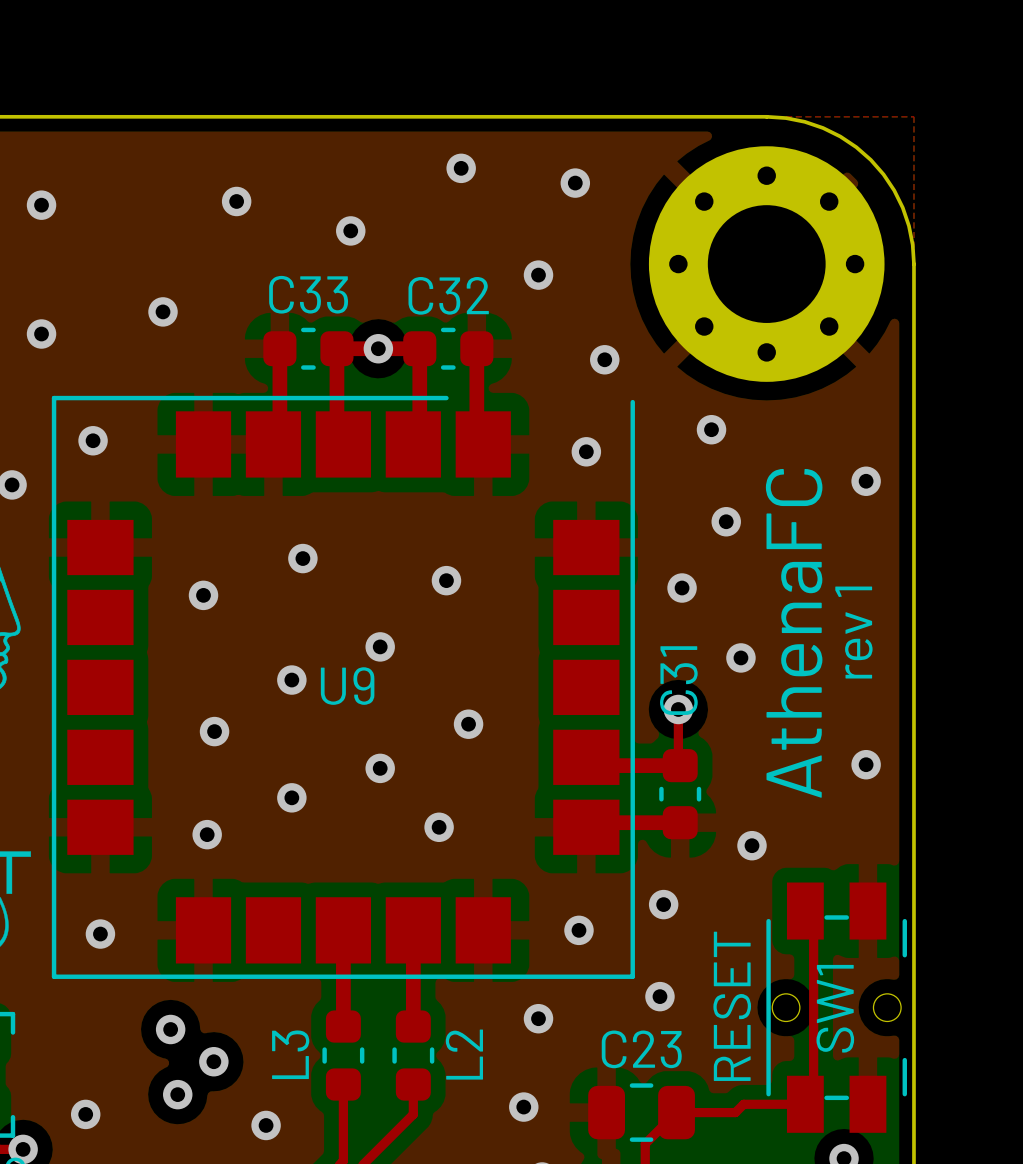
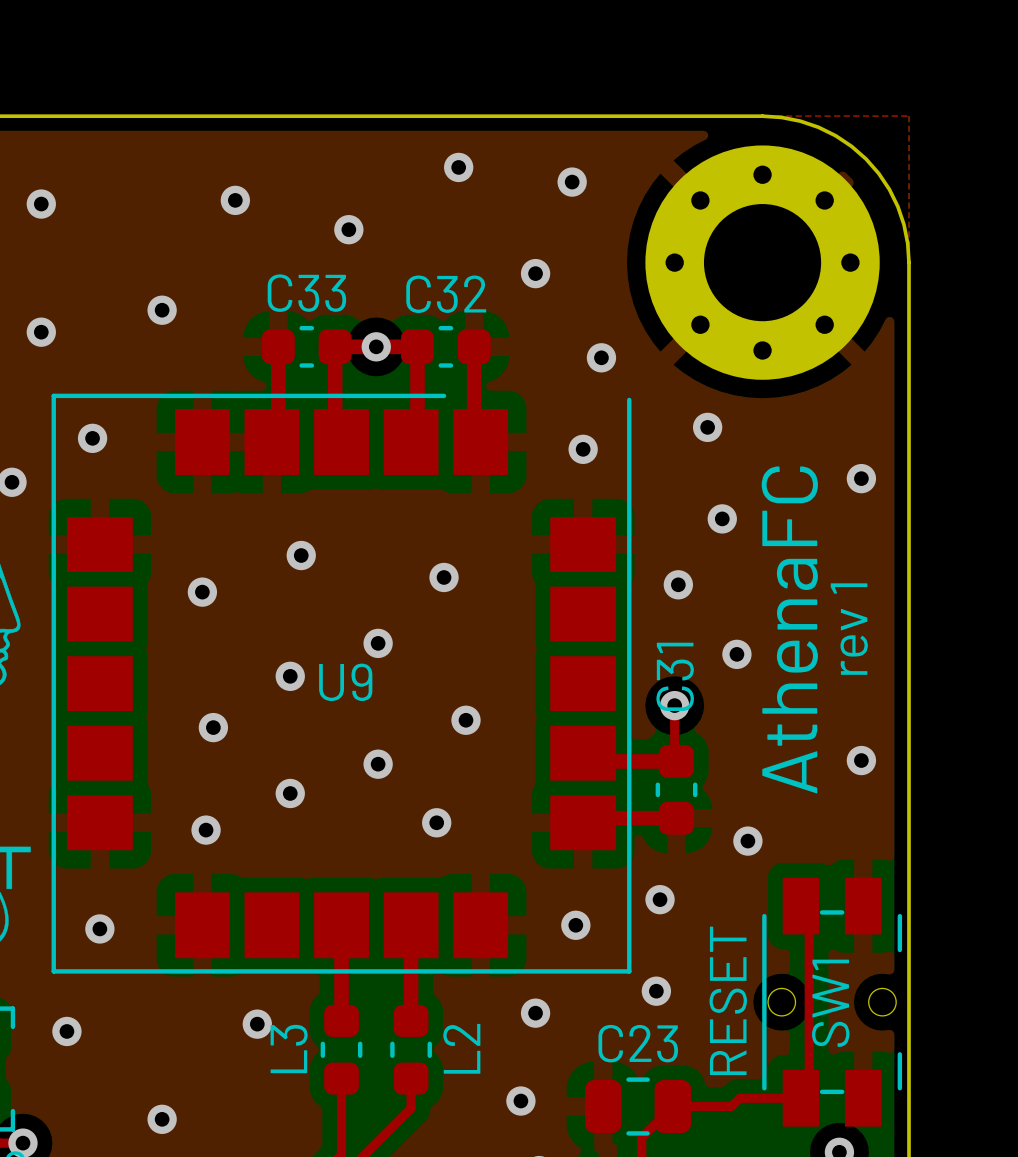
via: (170, 1029) -> none
via: none -> (257, 1024)
via: none -> (66, 1031)
via: (213, 1061) -> none
via position: (177, 1094) -> (162, 1119)
via: (85, 1114) -> none
via: (266, 1125) -> none

